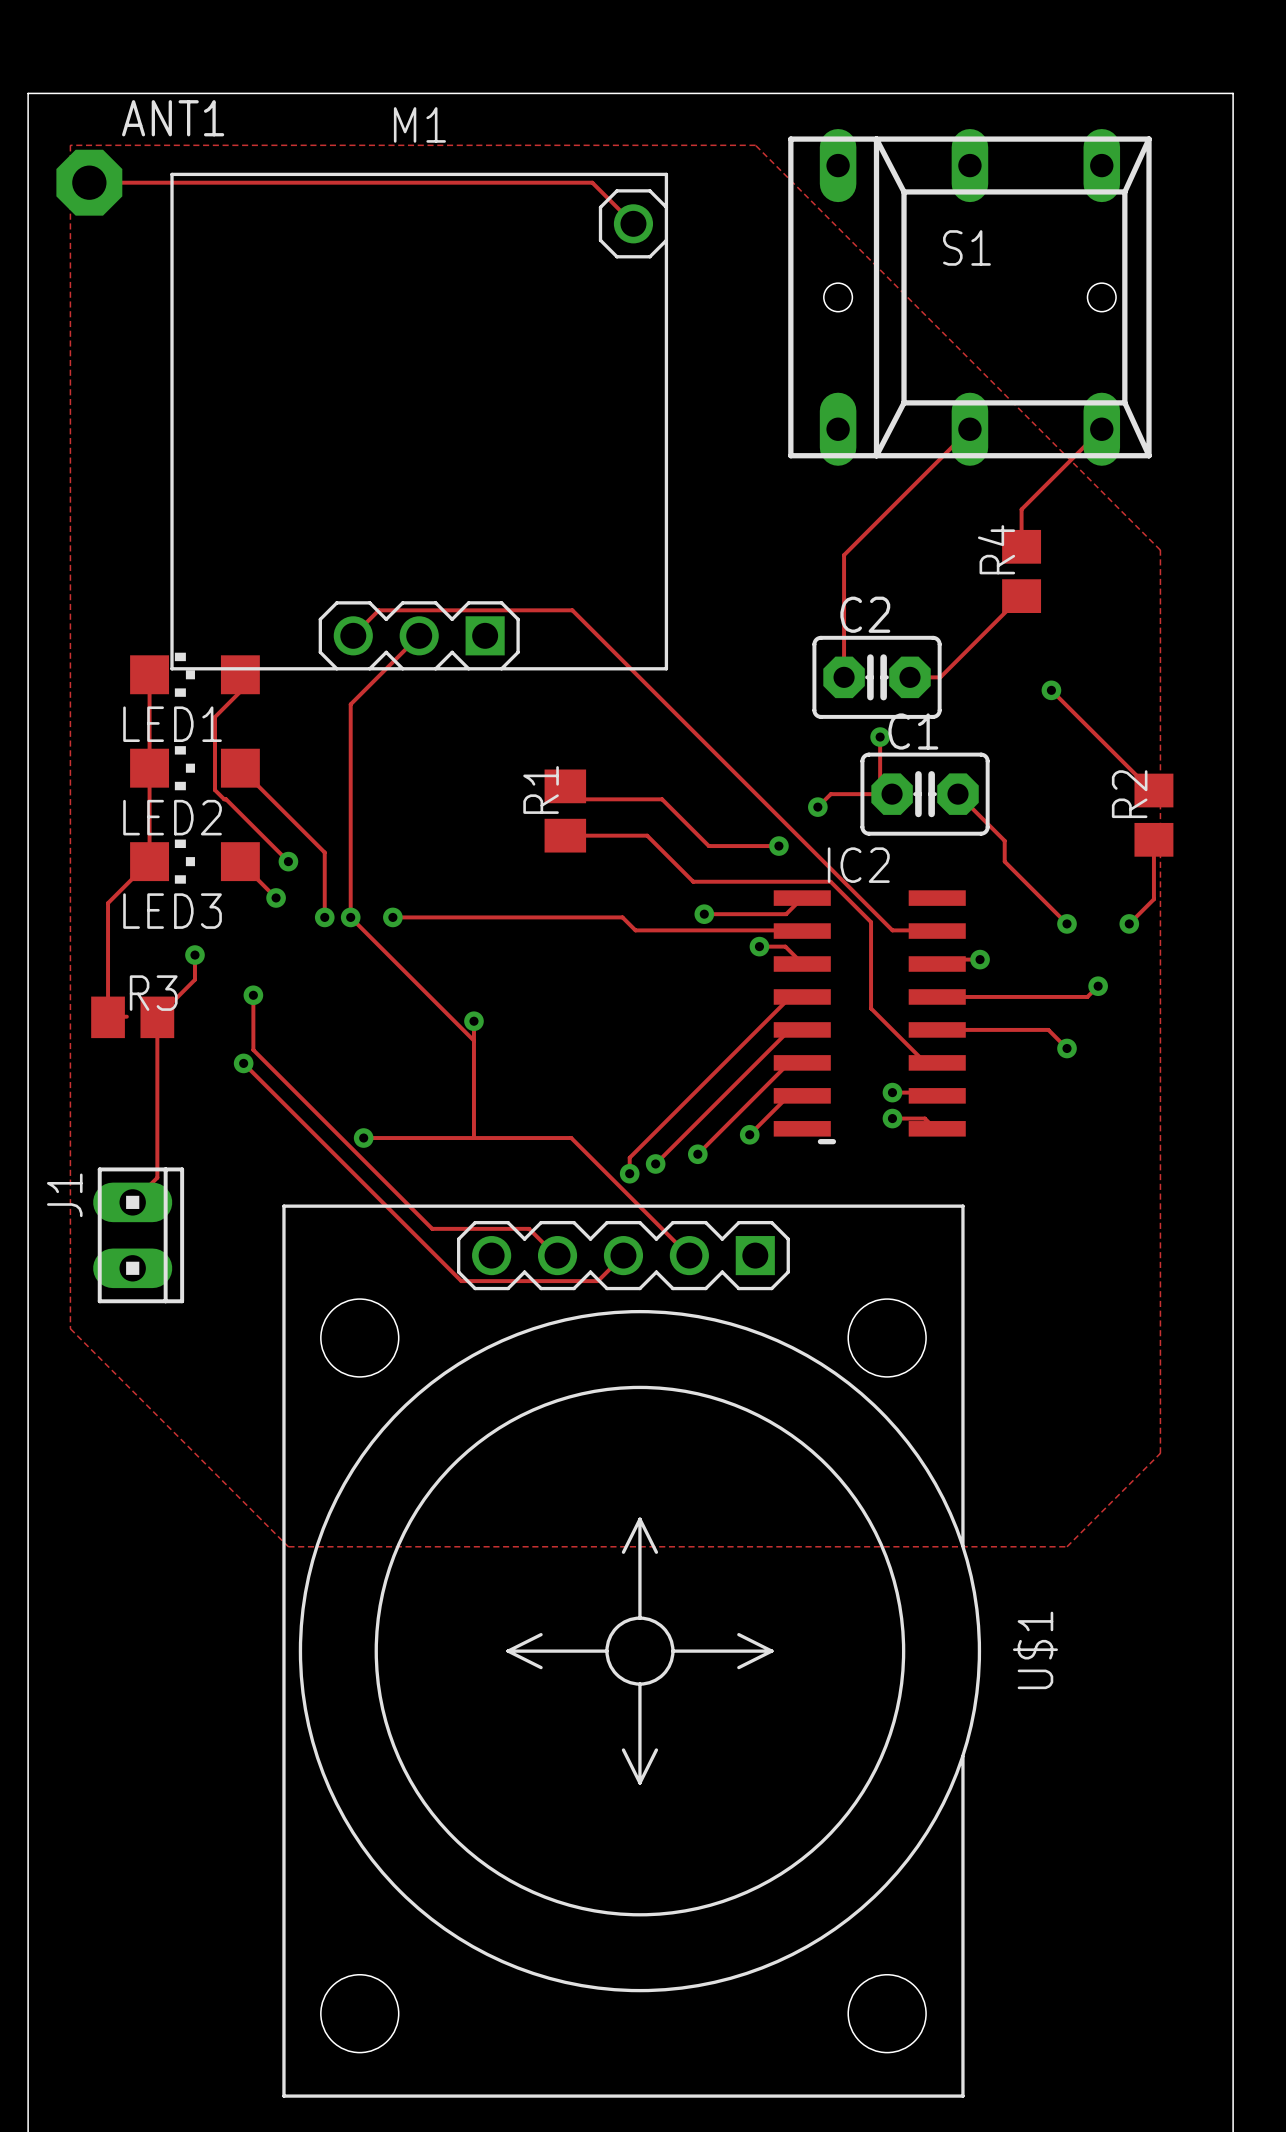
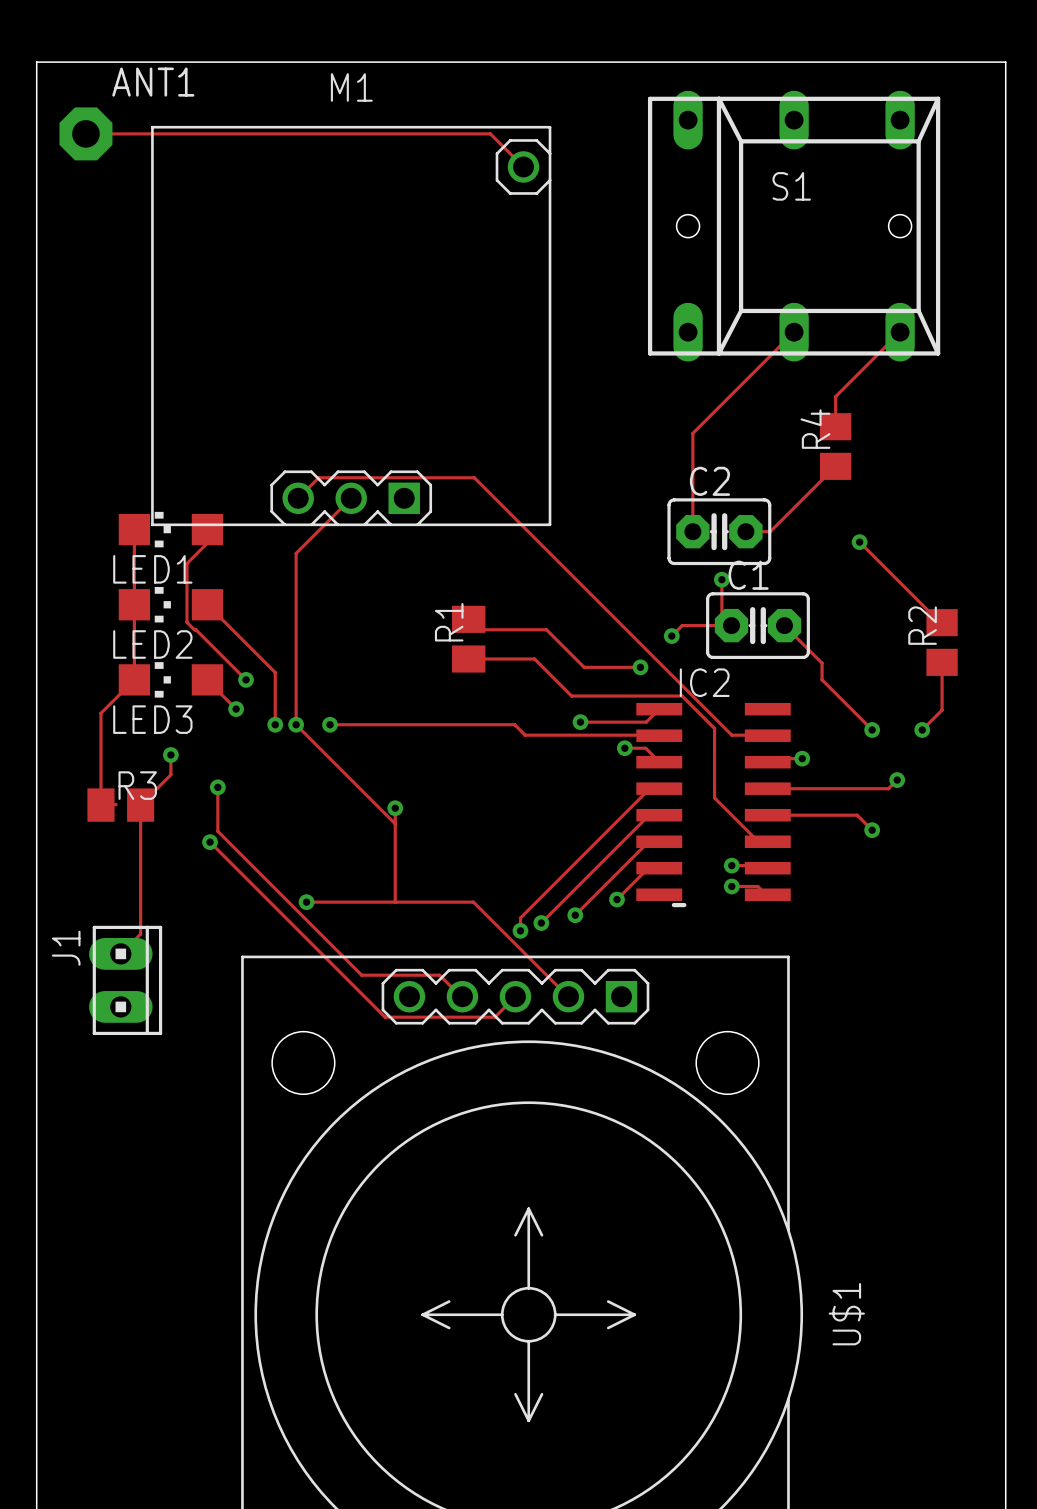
zone outline: (70, 145) (70, 1328) (288, 1546) (1067, 1546) (1160, 1453) (1160, 550) (755, 145) (70, 145) -> none

